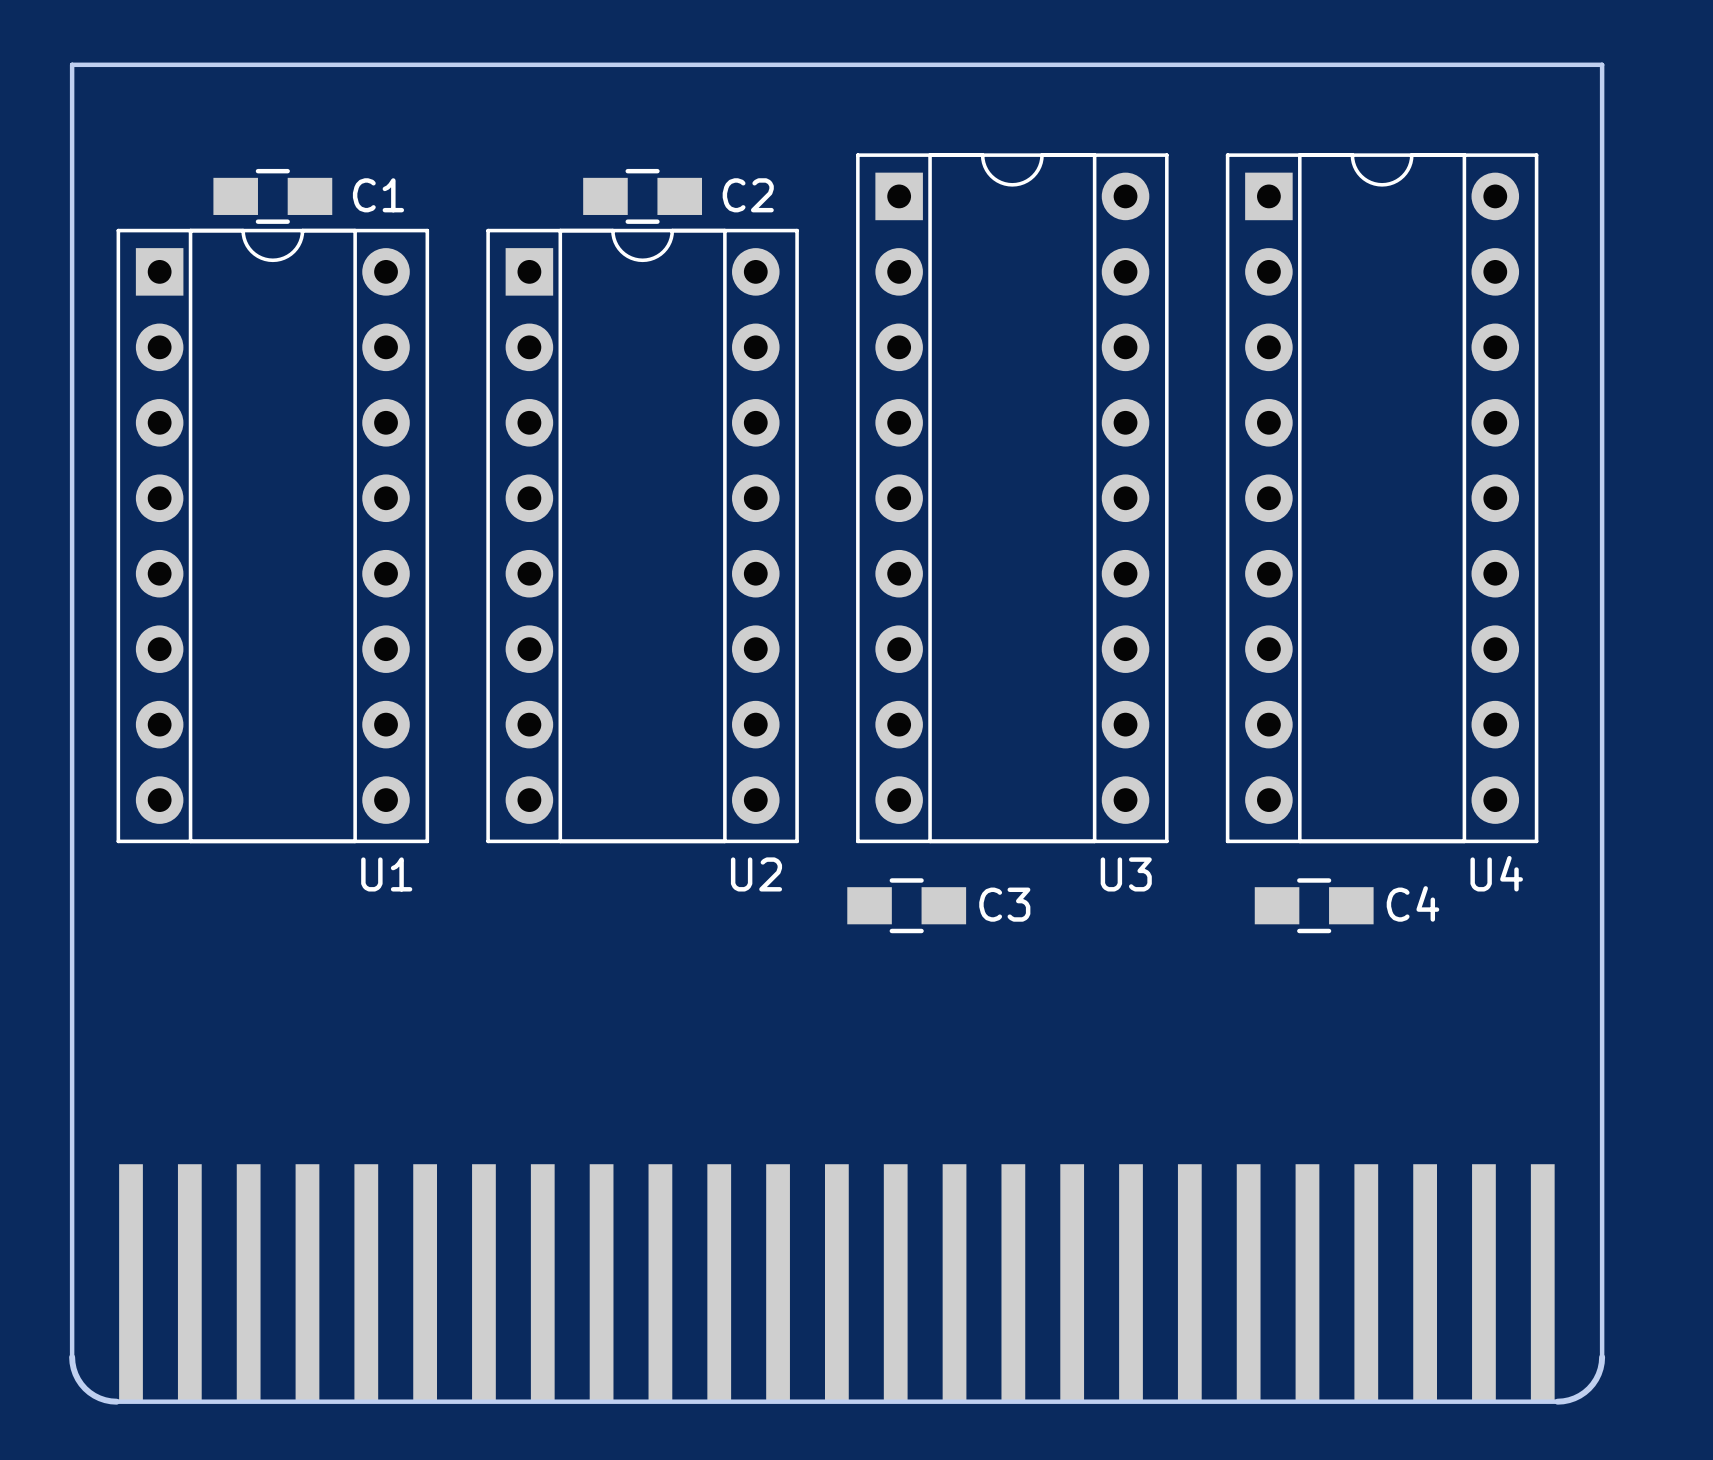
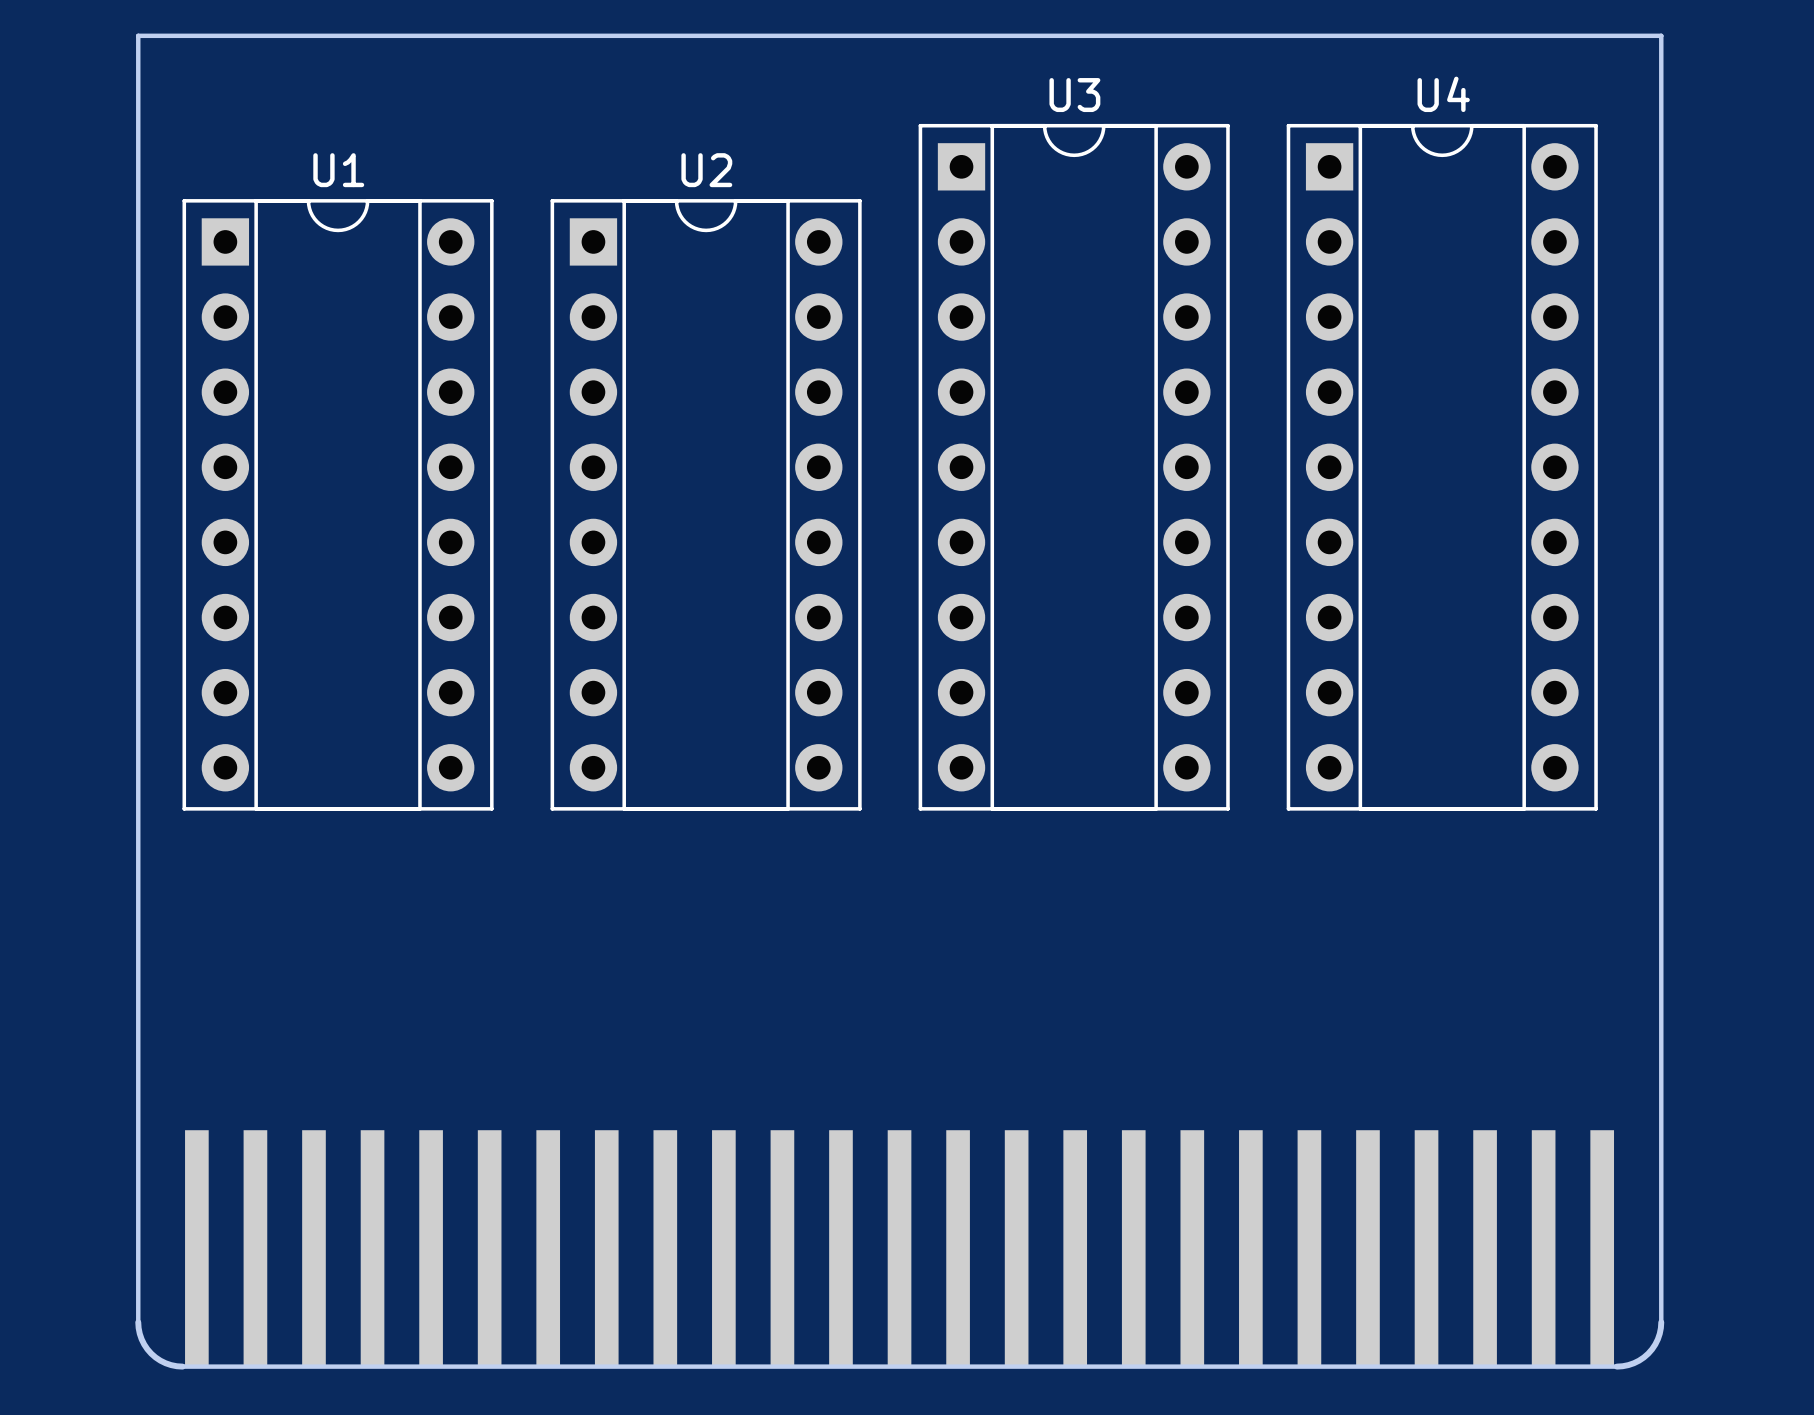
C1: (272, 196) -> none
C2: (642, 196) -> none
U4 name position: U4 (1496, 873) -> U4 (1443, 94)
U1 name position: U1 (386, 874) -> U1 (338, 170)
U2 name position: U2 (756, 874) -> U2 (706, 170)
U3 name position: U3 (1126, 874) -> U3 (1074, 95)
C3: (906, 905) -> none
C4: (1314, 905) -> none

